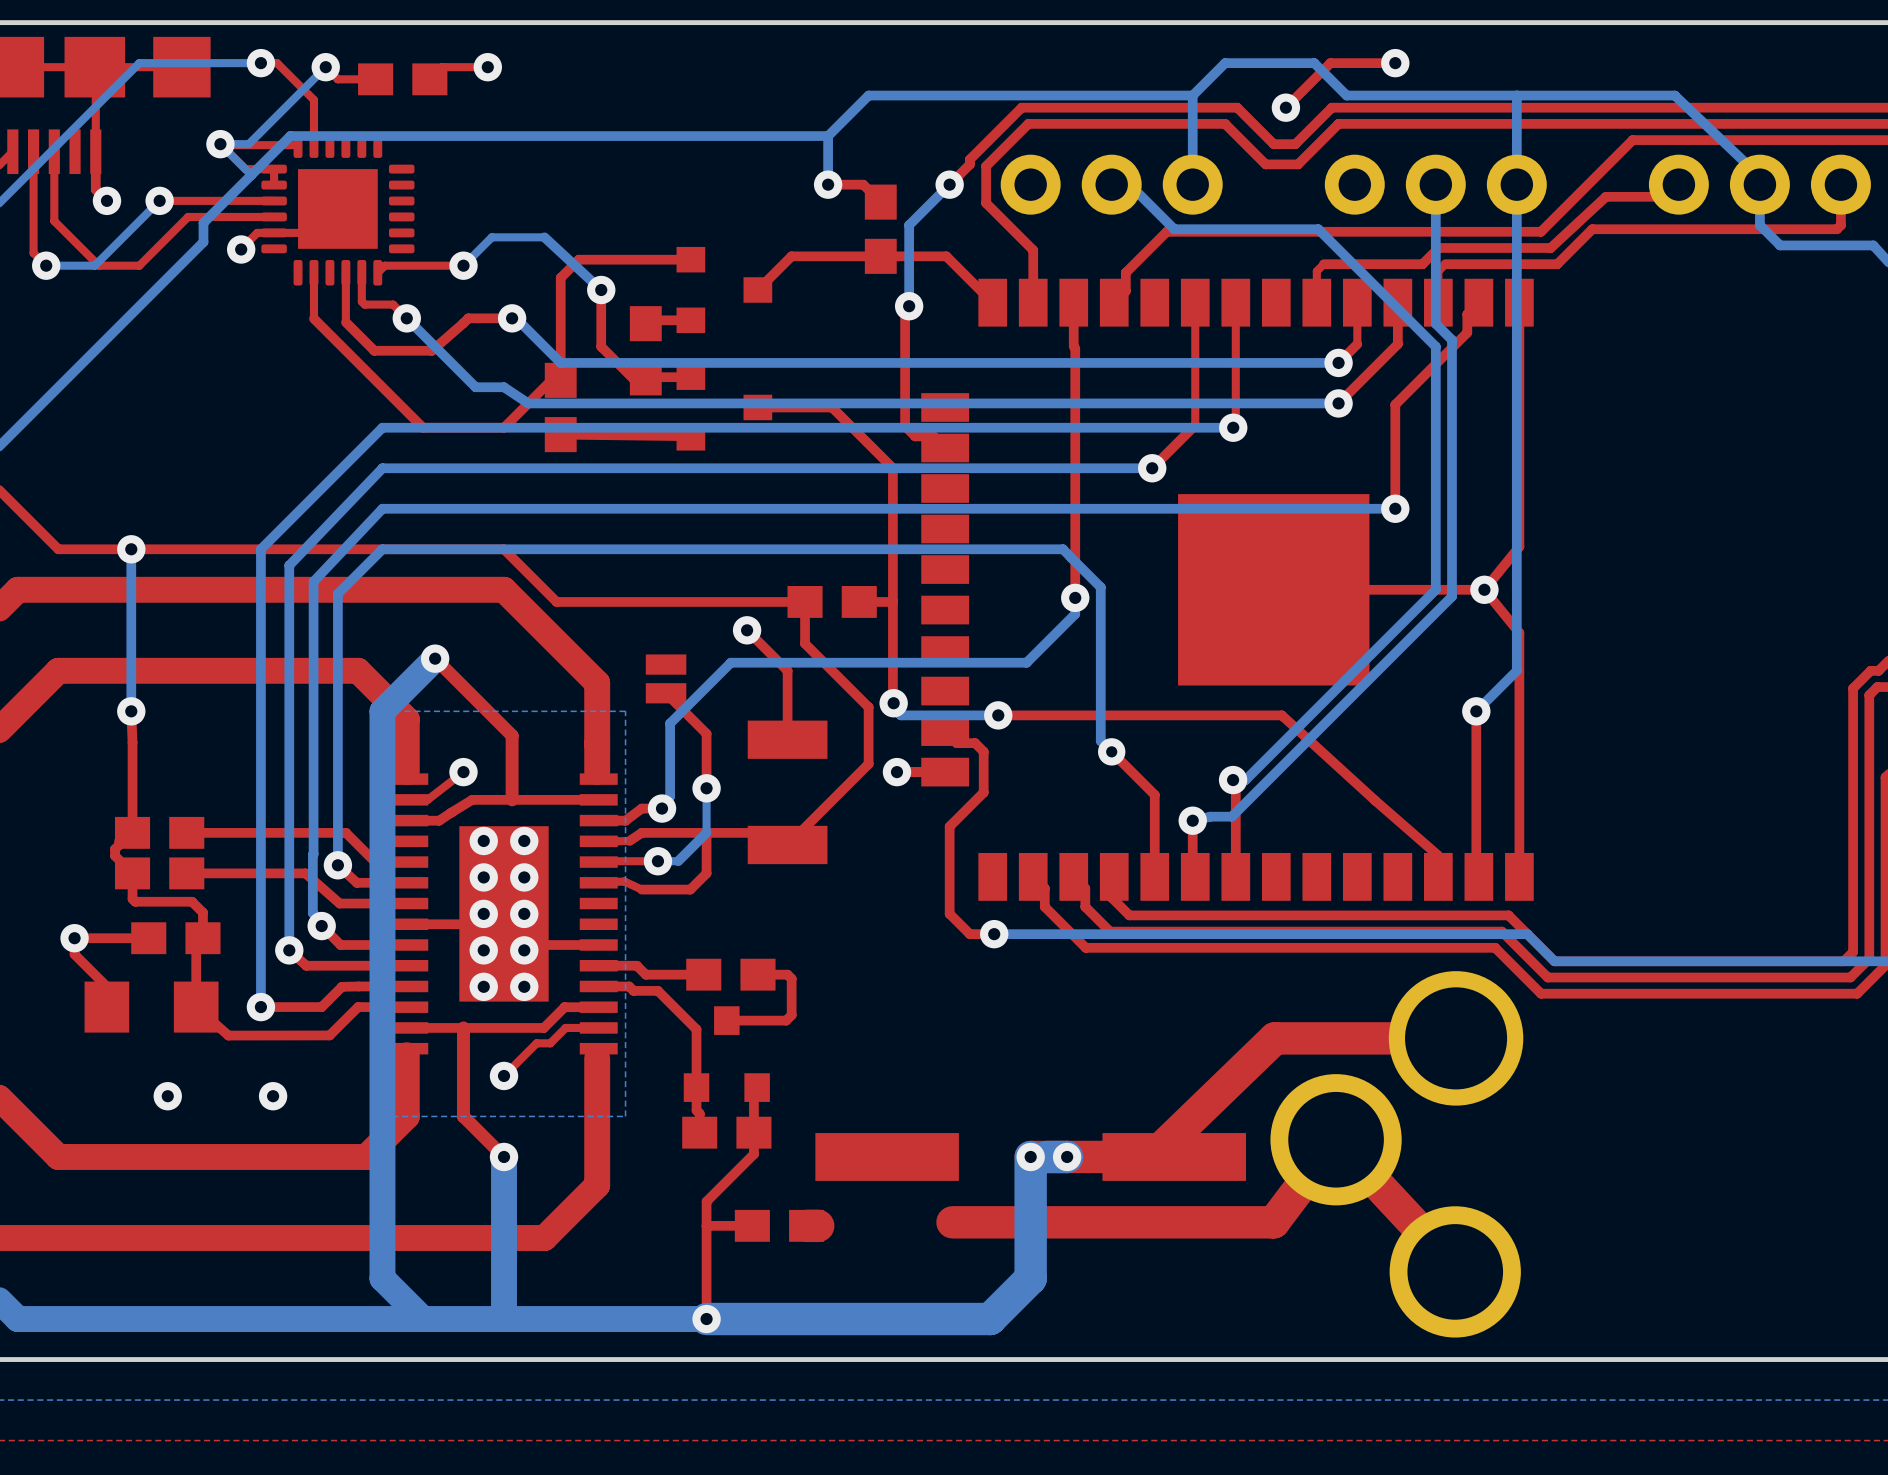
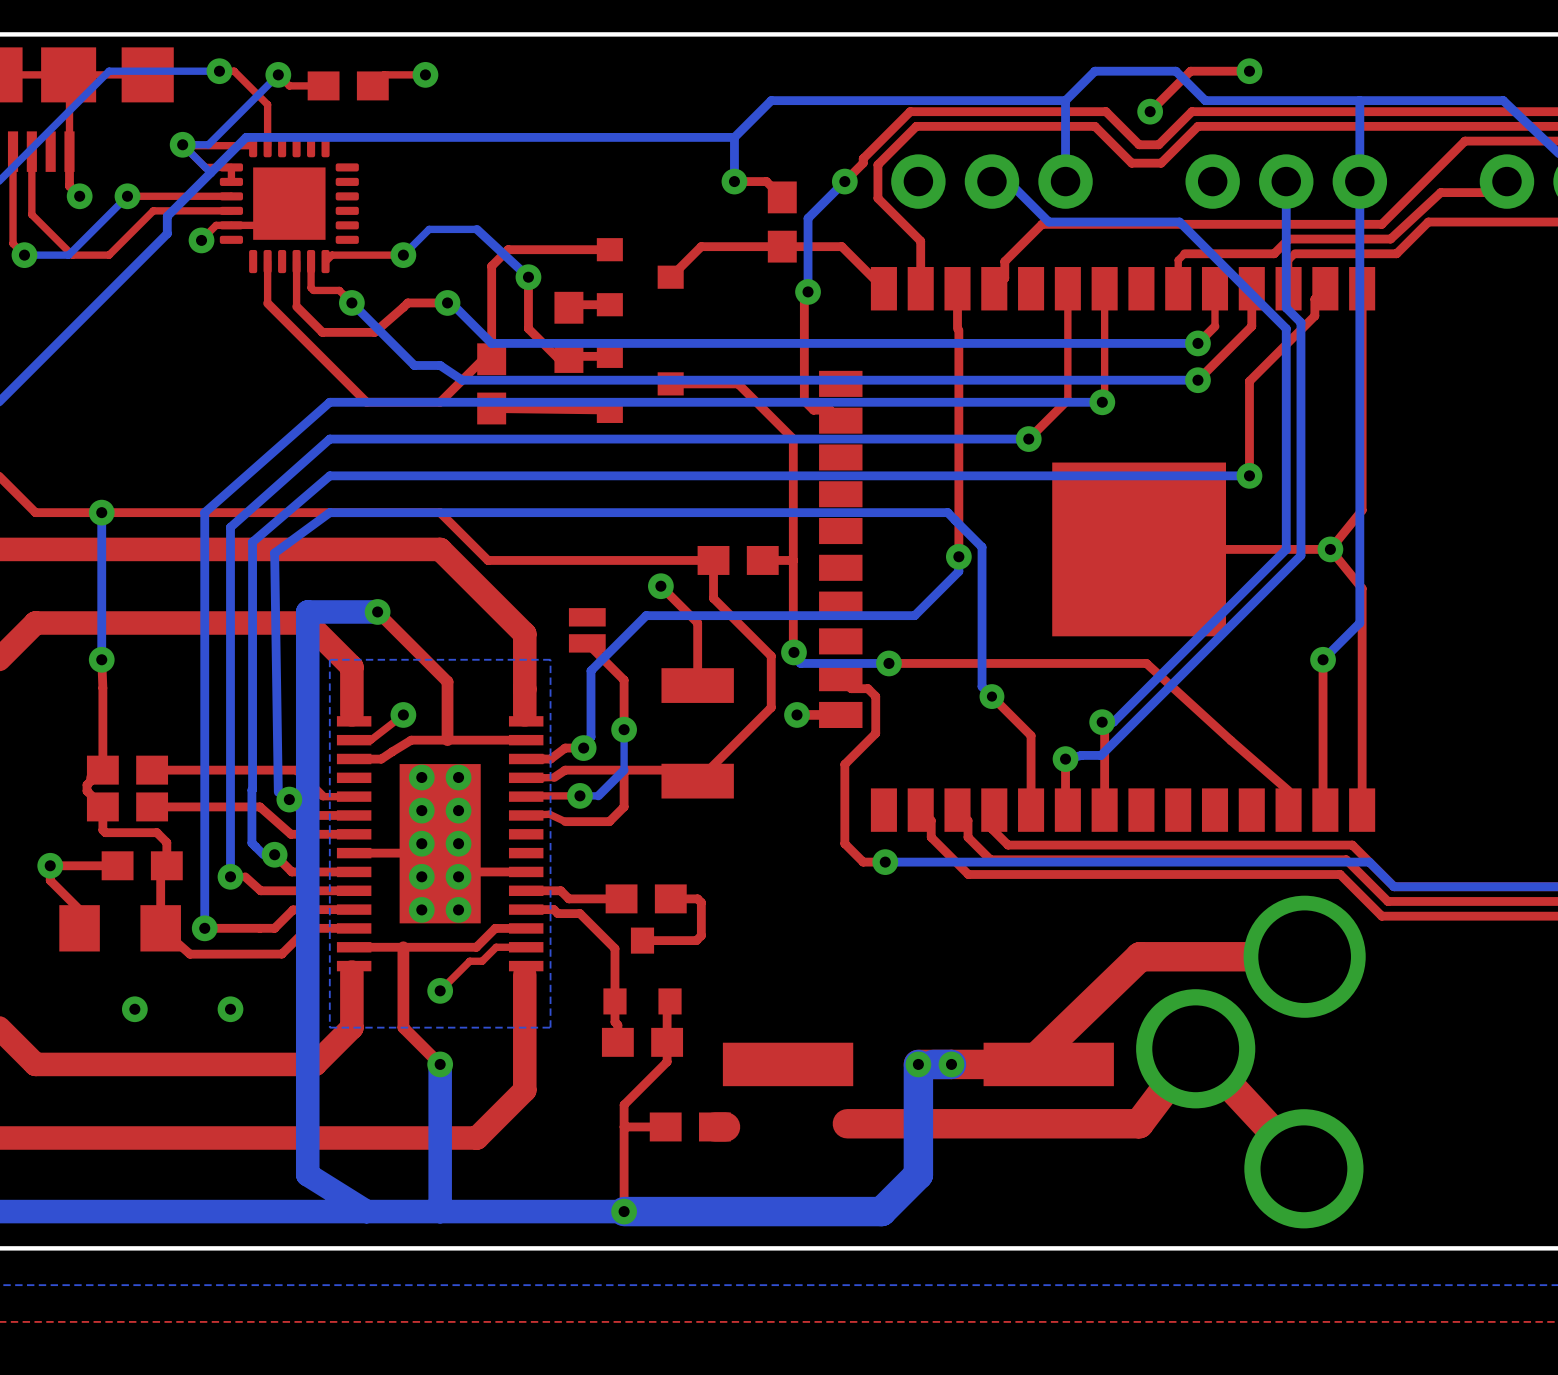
bottom track: (382, 427) (260, 549) (260, 1007) -> (329, 402) (204, 512) (204, 928)
bottom track: (382, 468) (289, 565) (289, 950) -> (329, 439) (230, 527) (230, 876)
bottom track: (382, 508) (313, 581) (312, 913) (321, 926) -> (329, 475) (252, 542) (251, 843) (263, 854)
bottom track: (382, 549) (337, 593) (337, 865) -> (329, 512) (274, 553) (278, 792)
bottom track: (435, 658) (382, 711) (382, 1278) (422, 1319) -> (377, 611) (307, 611) (307, 1174) (366, 1211)
via position: (289, 950) -> (230, 876)
via position: (260, 1007) -> (204, 928)

